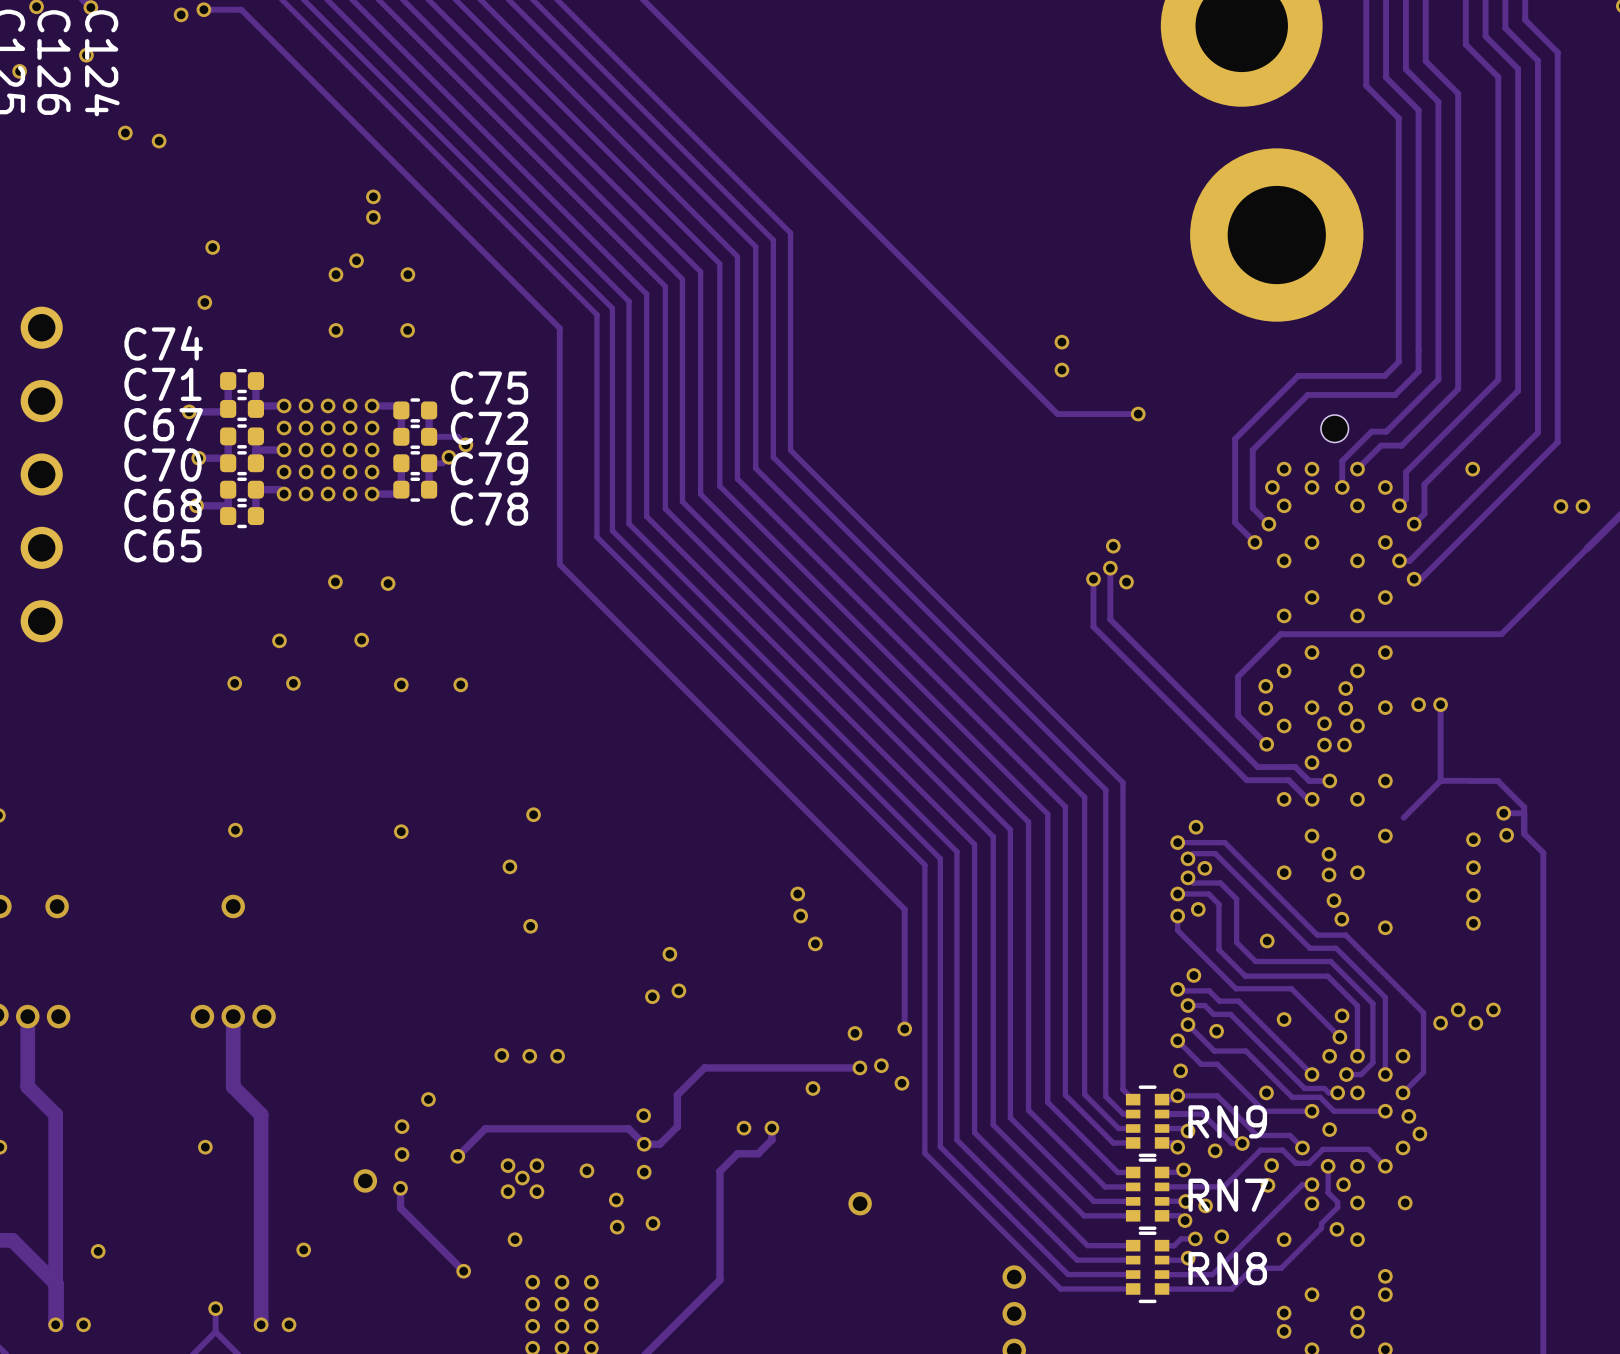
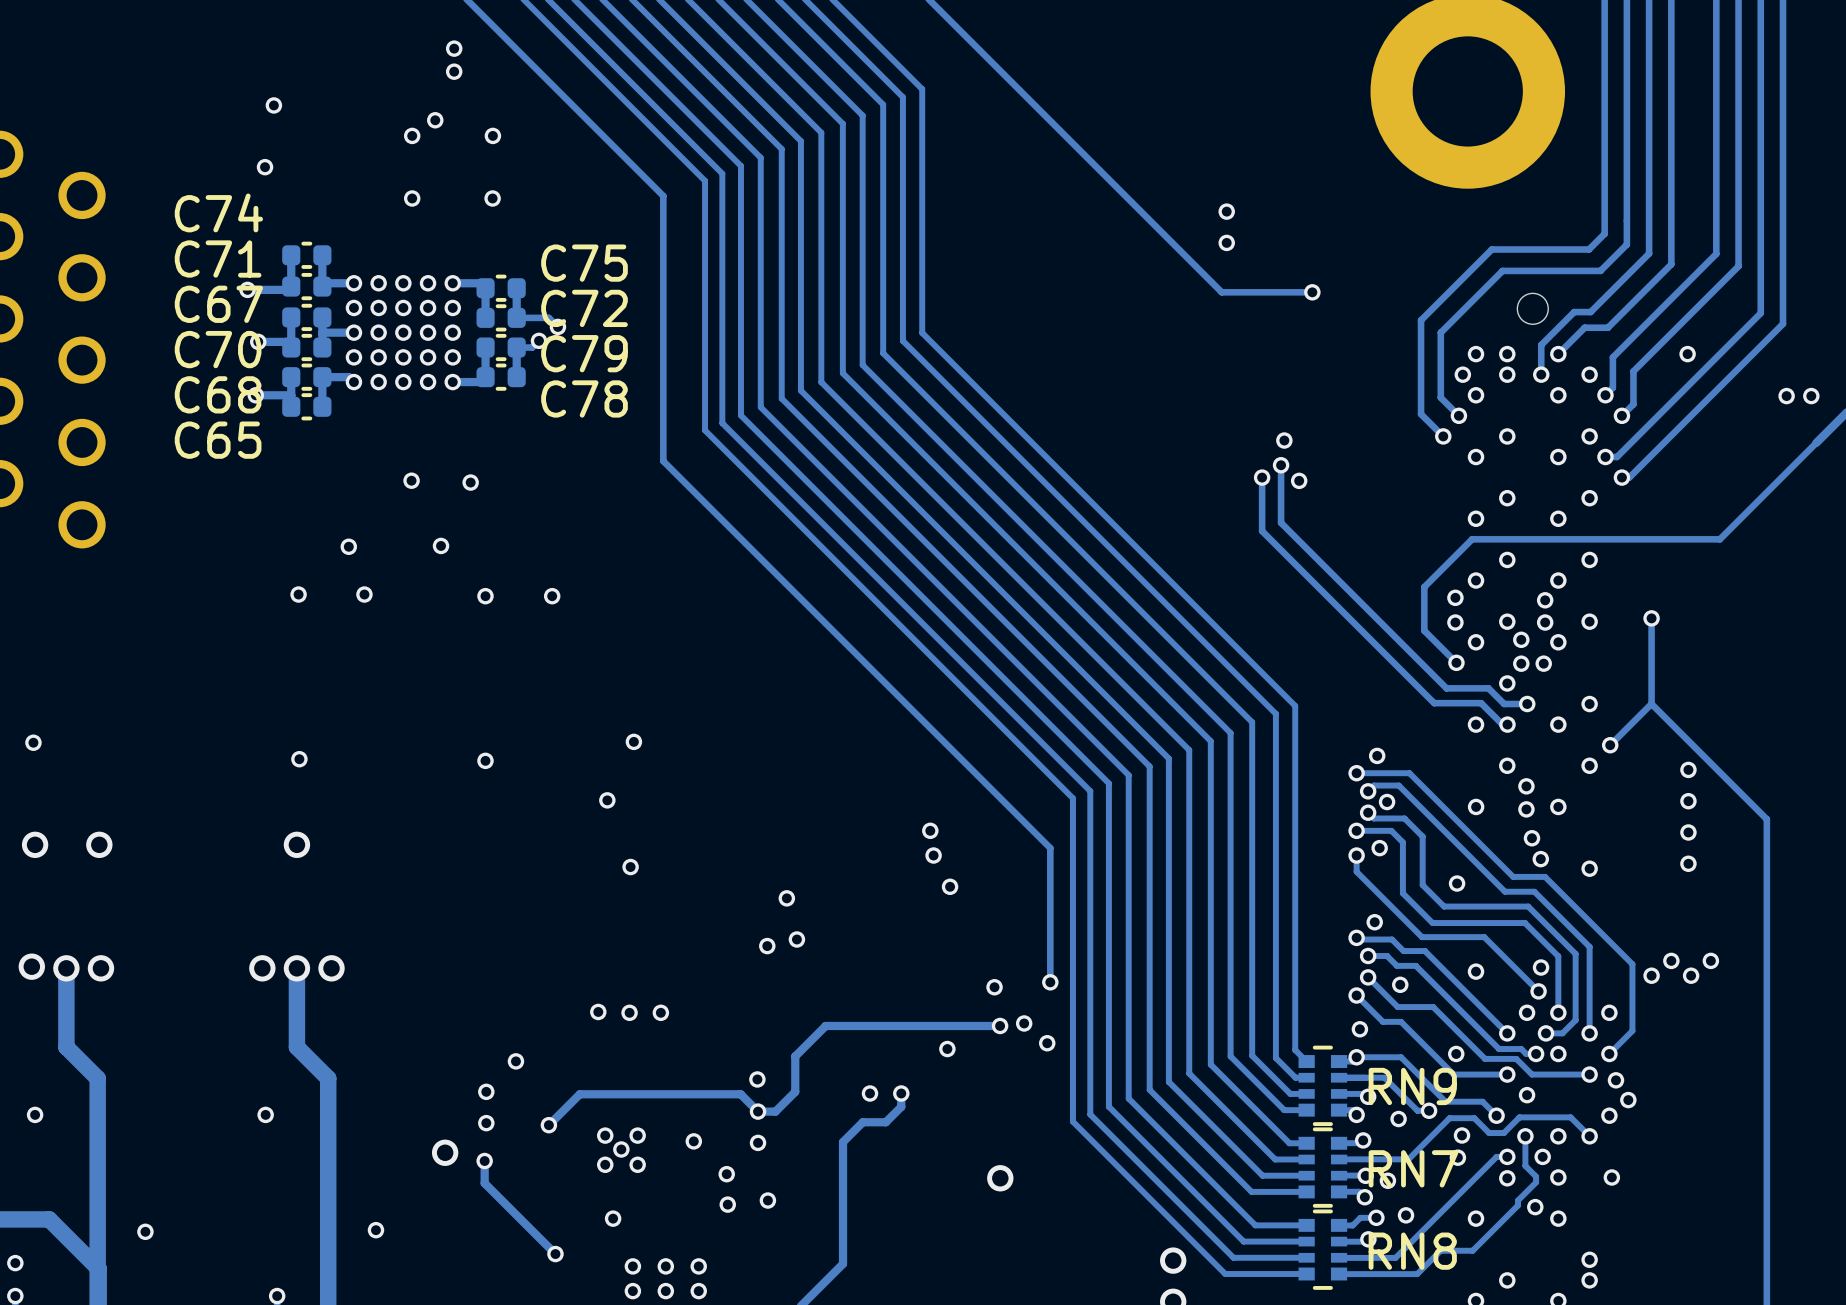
via: (1418, 704) -> none
track: (1471, 780) (1497, 780) (1524, 807) (1524, 833) (1543, 852) (1543, 883) -> (1651, 704) (1766, 819)
track: (1471, 780) (1440, 780) -> none
via: (1503, 813) -> none
track: (1524, 813) (1503, 813) -> none
via: none -> (1610, 745)
via: (1506, 835) -> none

